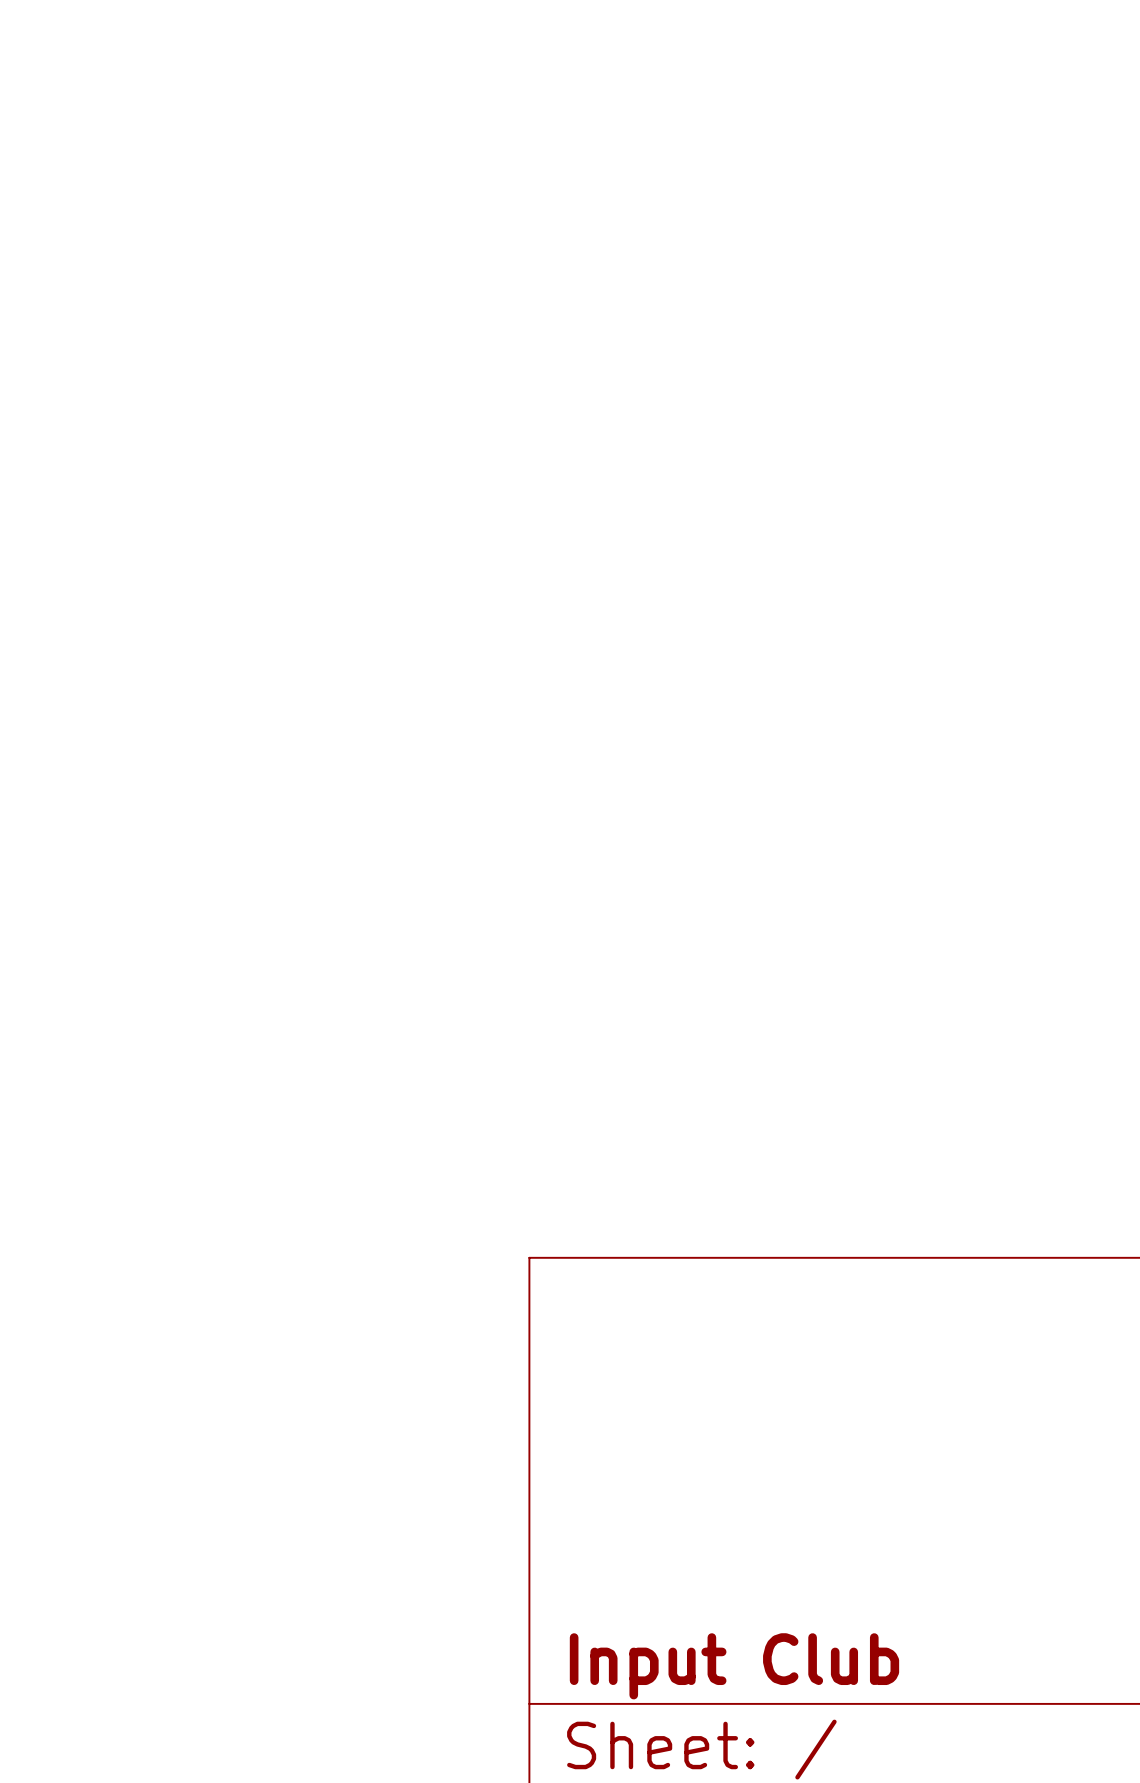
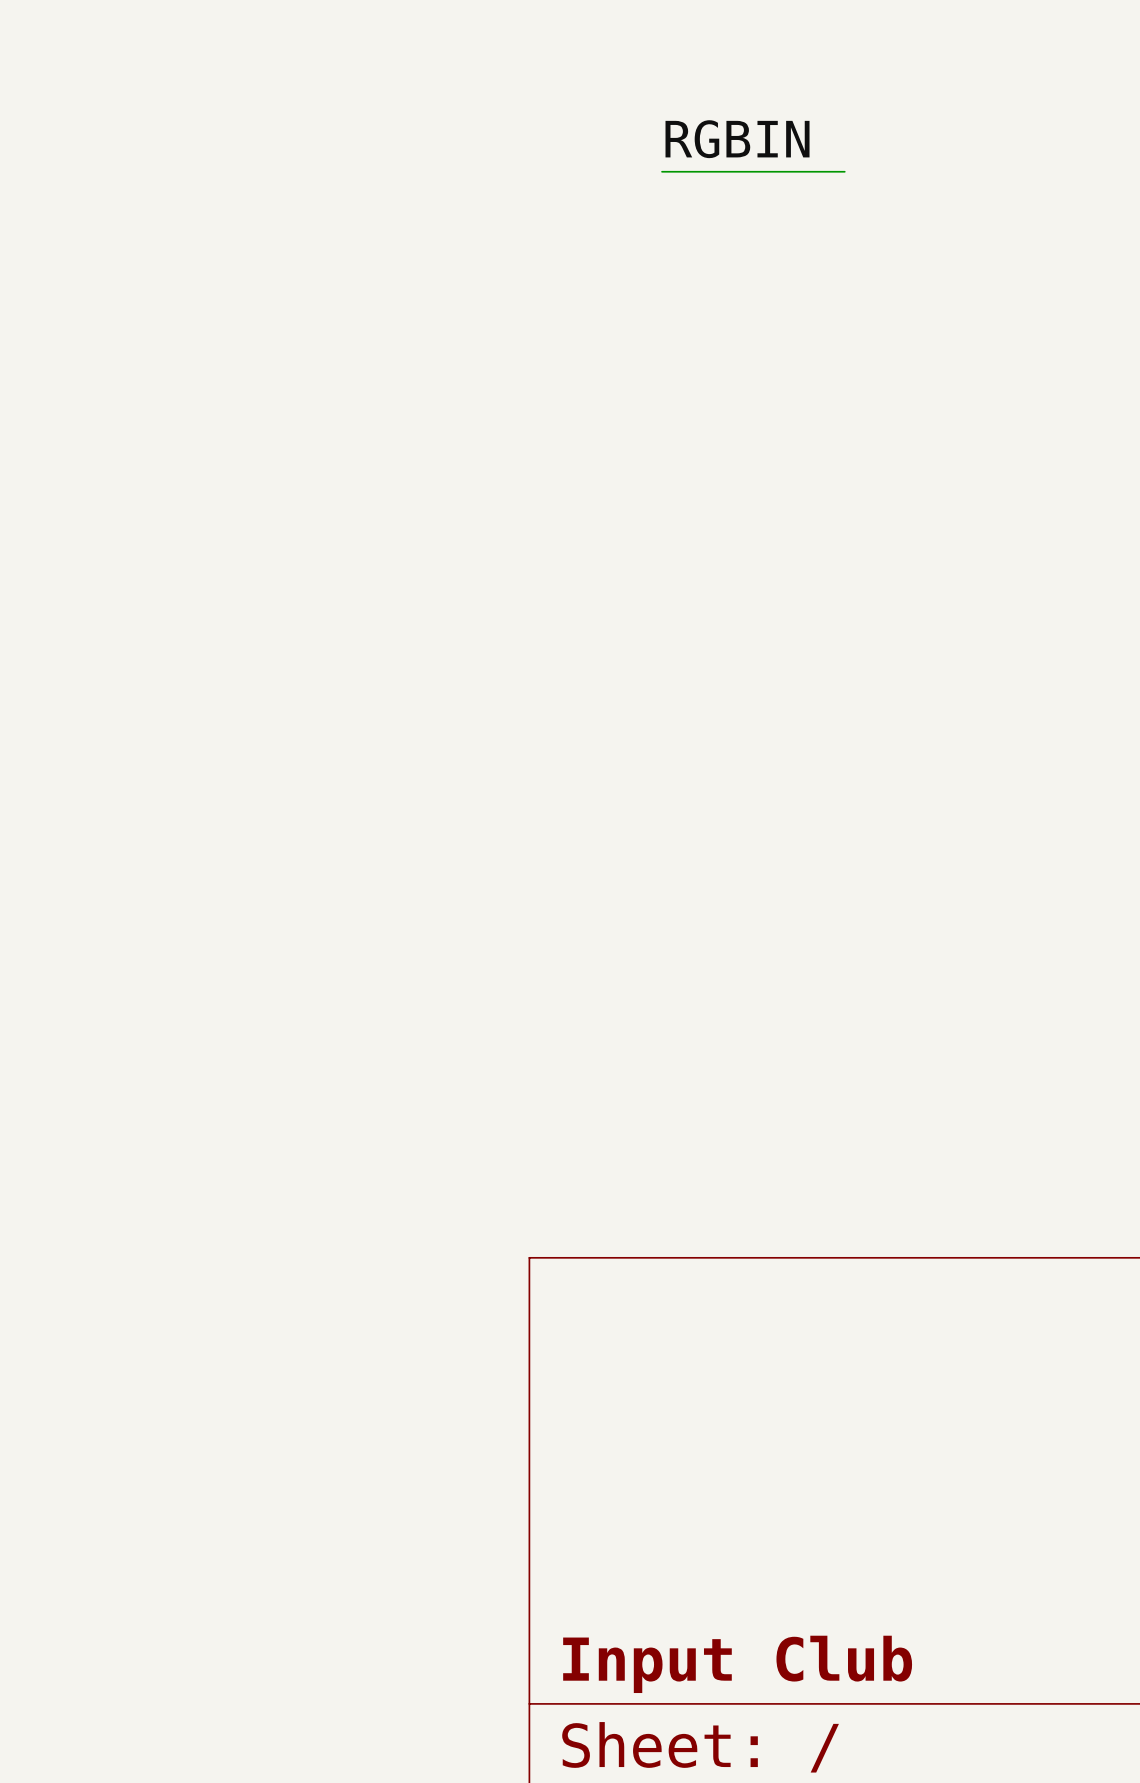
label: none -> RGBIN (737, 139)
wire: none -> (662, 171) (844, 171)

